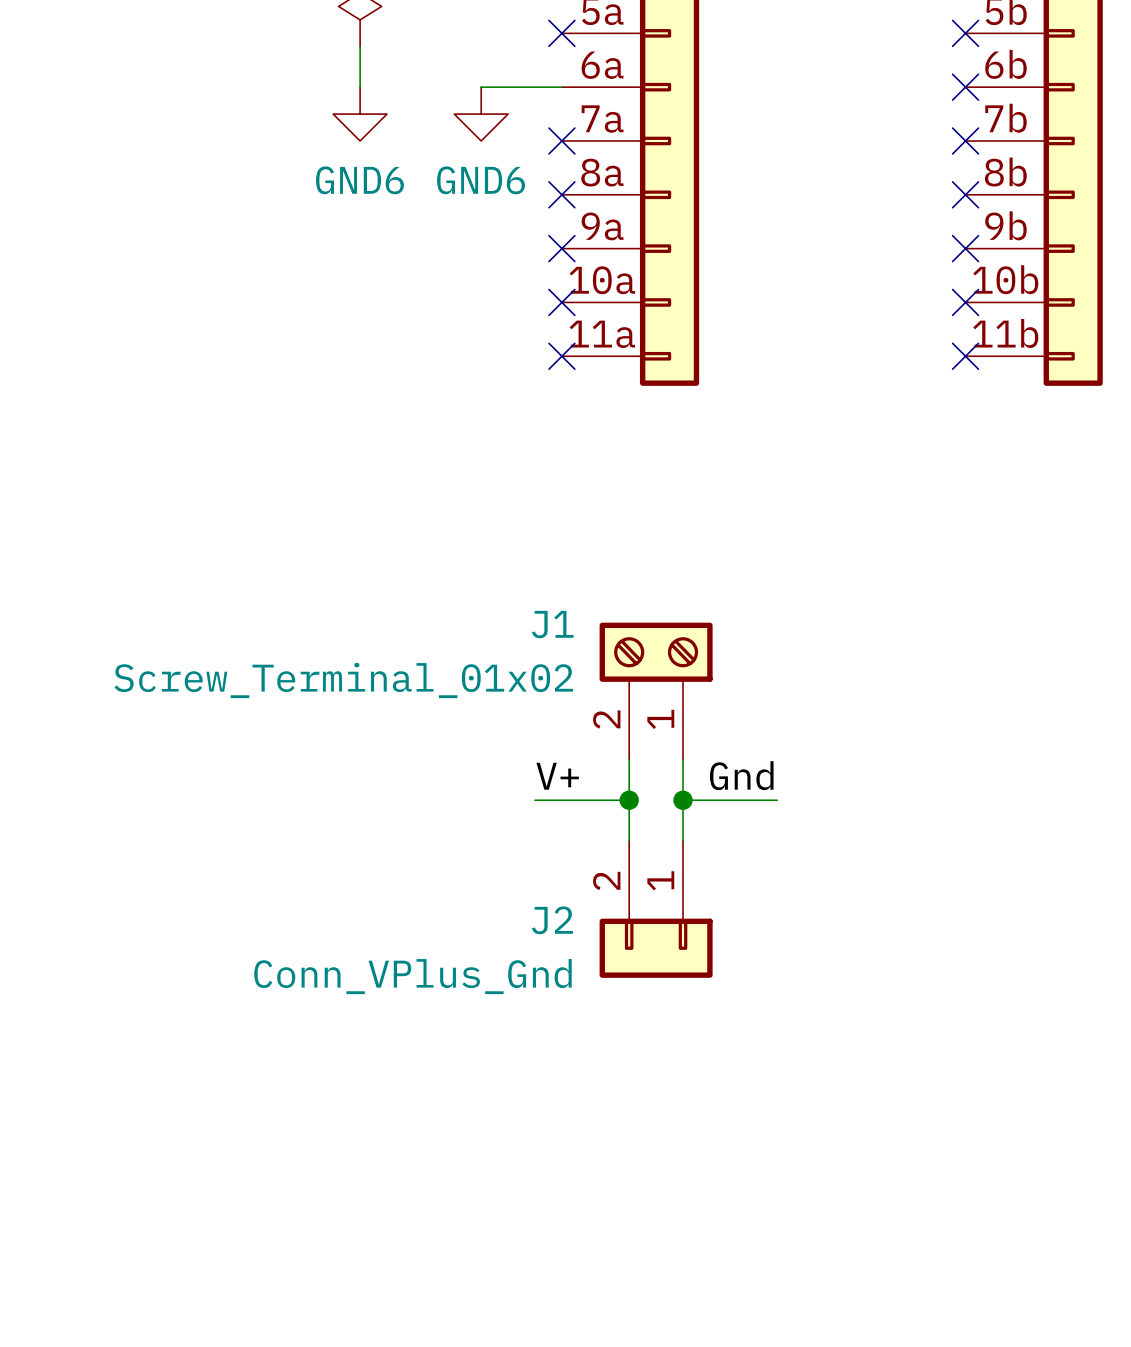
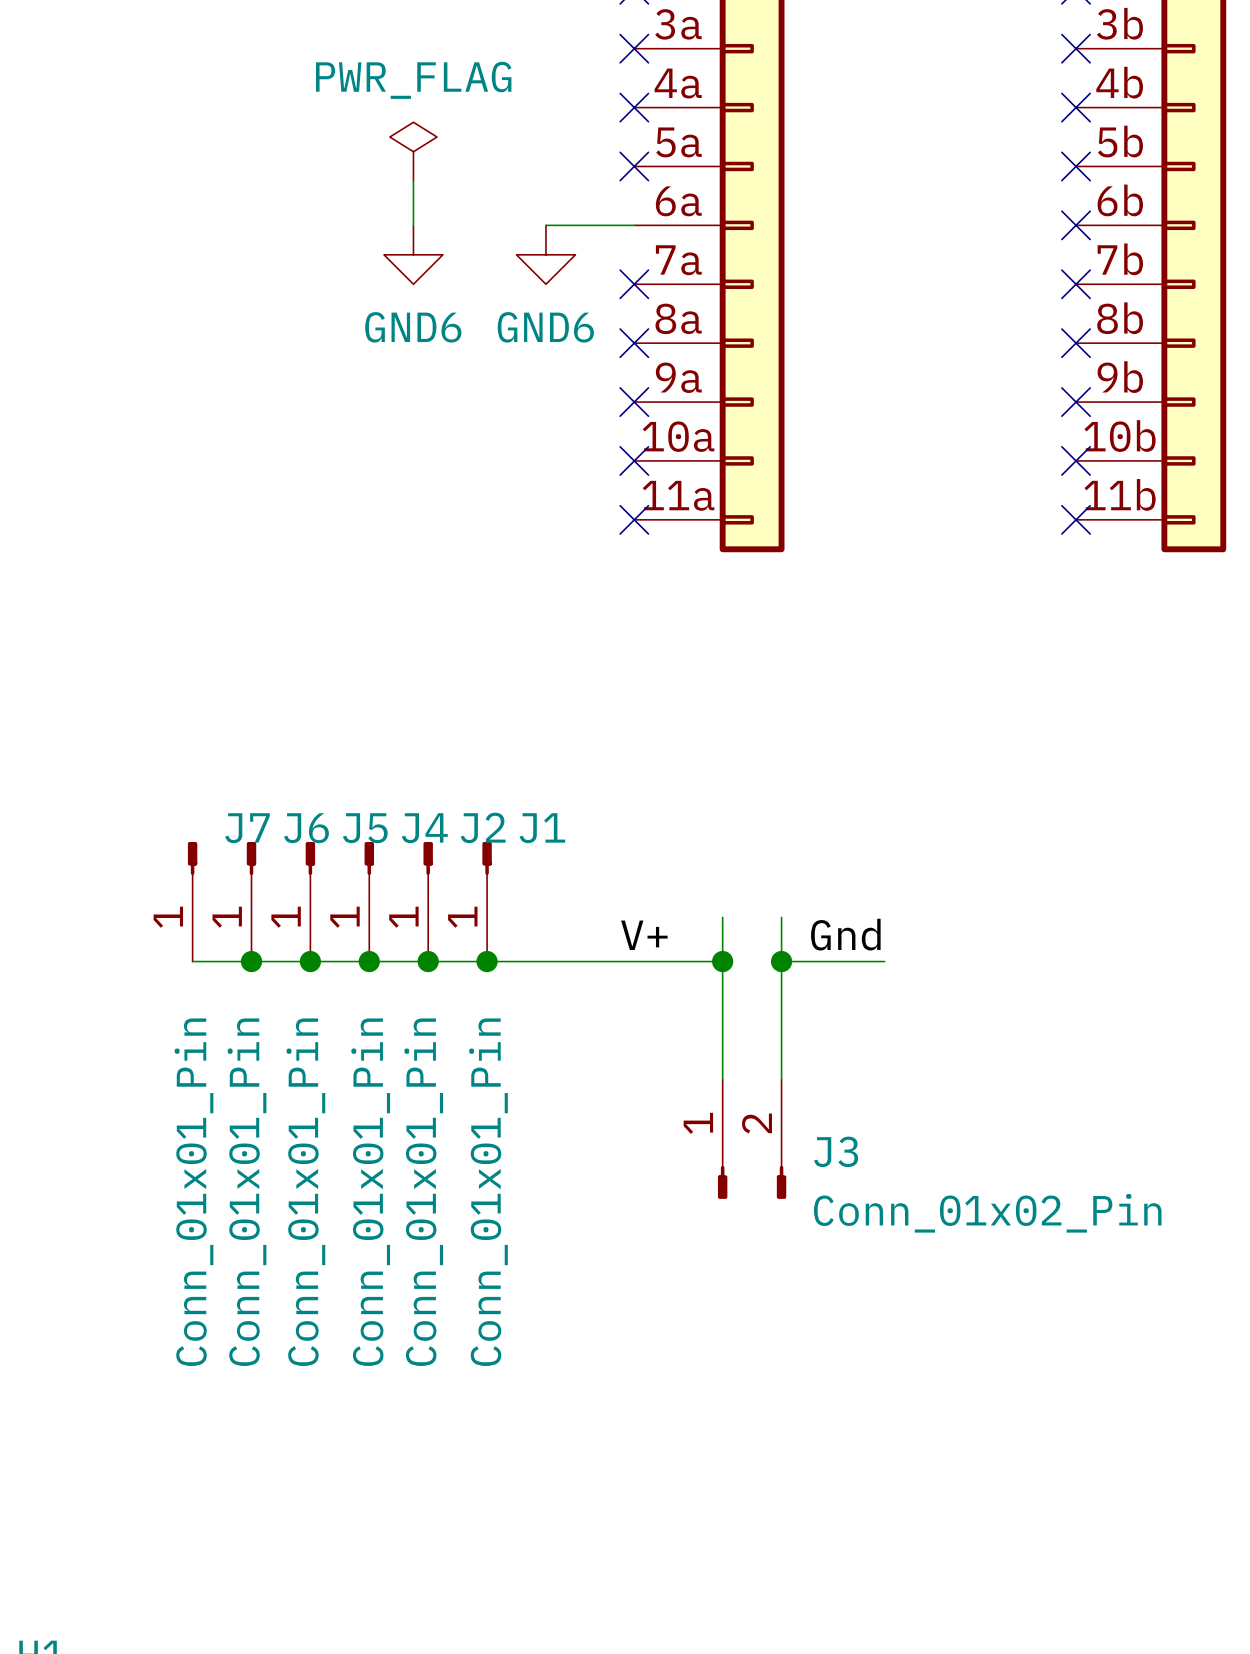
J1 symbol: [599, 622, 713, 760] -> [482, 841, 492, 962]
J1 name position: J1 (552, 624) -> J1 (542, 828)
J1 value: Screw_Terminal_01x02 (343, 680) -> Conn_01x01_Pin (488, 1192)
J7: none -> Conn_01x01_Pin (192, 901)
J6: none -> Conn_01x01_Pin (251, 901)
J5: none -> Conn_01x01_Pin (310, 901)
J4: none -> Conn_01x01_Pin (369, 901)
wire: none -> (722, 917) (722, 1079)
wire: none -> (781, 917) (781, 1079)
wire: none -> (192, 961) (722, 961)
junction: none -> (251, 961)
junction: none -> (310, 961)
junction: none -> (369, 961)
junction: none -> (428, 961)
junction: none -> (487, 961)
wire: (629, 759) (629, 840) -> none
junction: none -> (722, 961)
wire: (683, 759) (683, 840) -> none
junction: none -> (781, 961)
label position: Gnd (741, 775) -> Gnd (845, 934)
label position: V+ (557, 776) -> V+ (644, 935)
wire: (535, 800) (629, 800) -> none
junction: (629, 800) -> none
wire: (683, 800) (777, 800) -> (781, 961) (884, 961)
junction: (683, 800) -> none
J2 symbol: [599, 840, 713, 978] -> [423, 841, 433, 962]
J2 name position: J2 (552, 920) -> J2 (483, 827)
J3: none -> Conn_01x02_Pin (752, 1139)
J2 value: Conn_VPlus_Gnd (412, 976) -> Conn_01x01_Pin (423, 1192)

